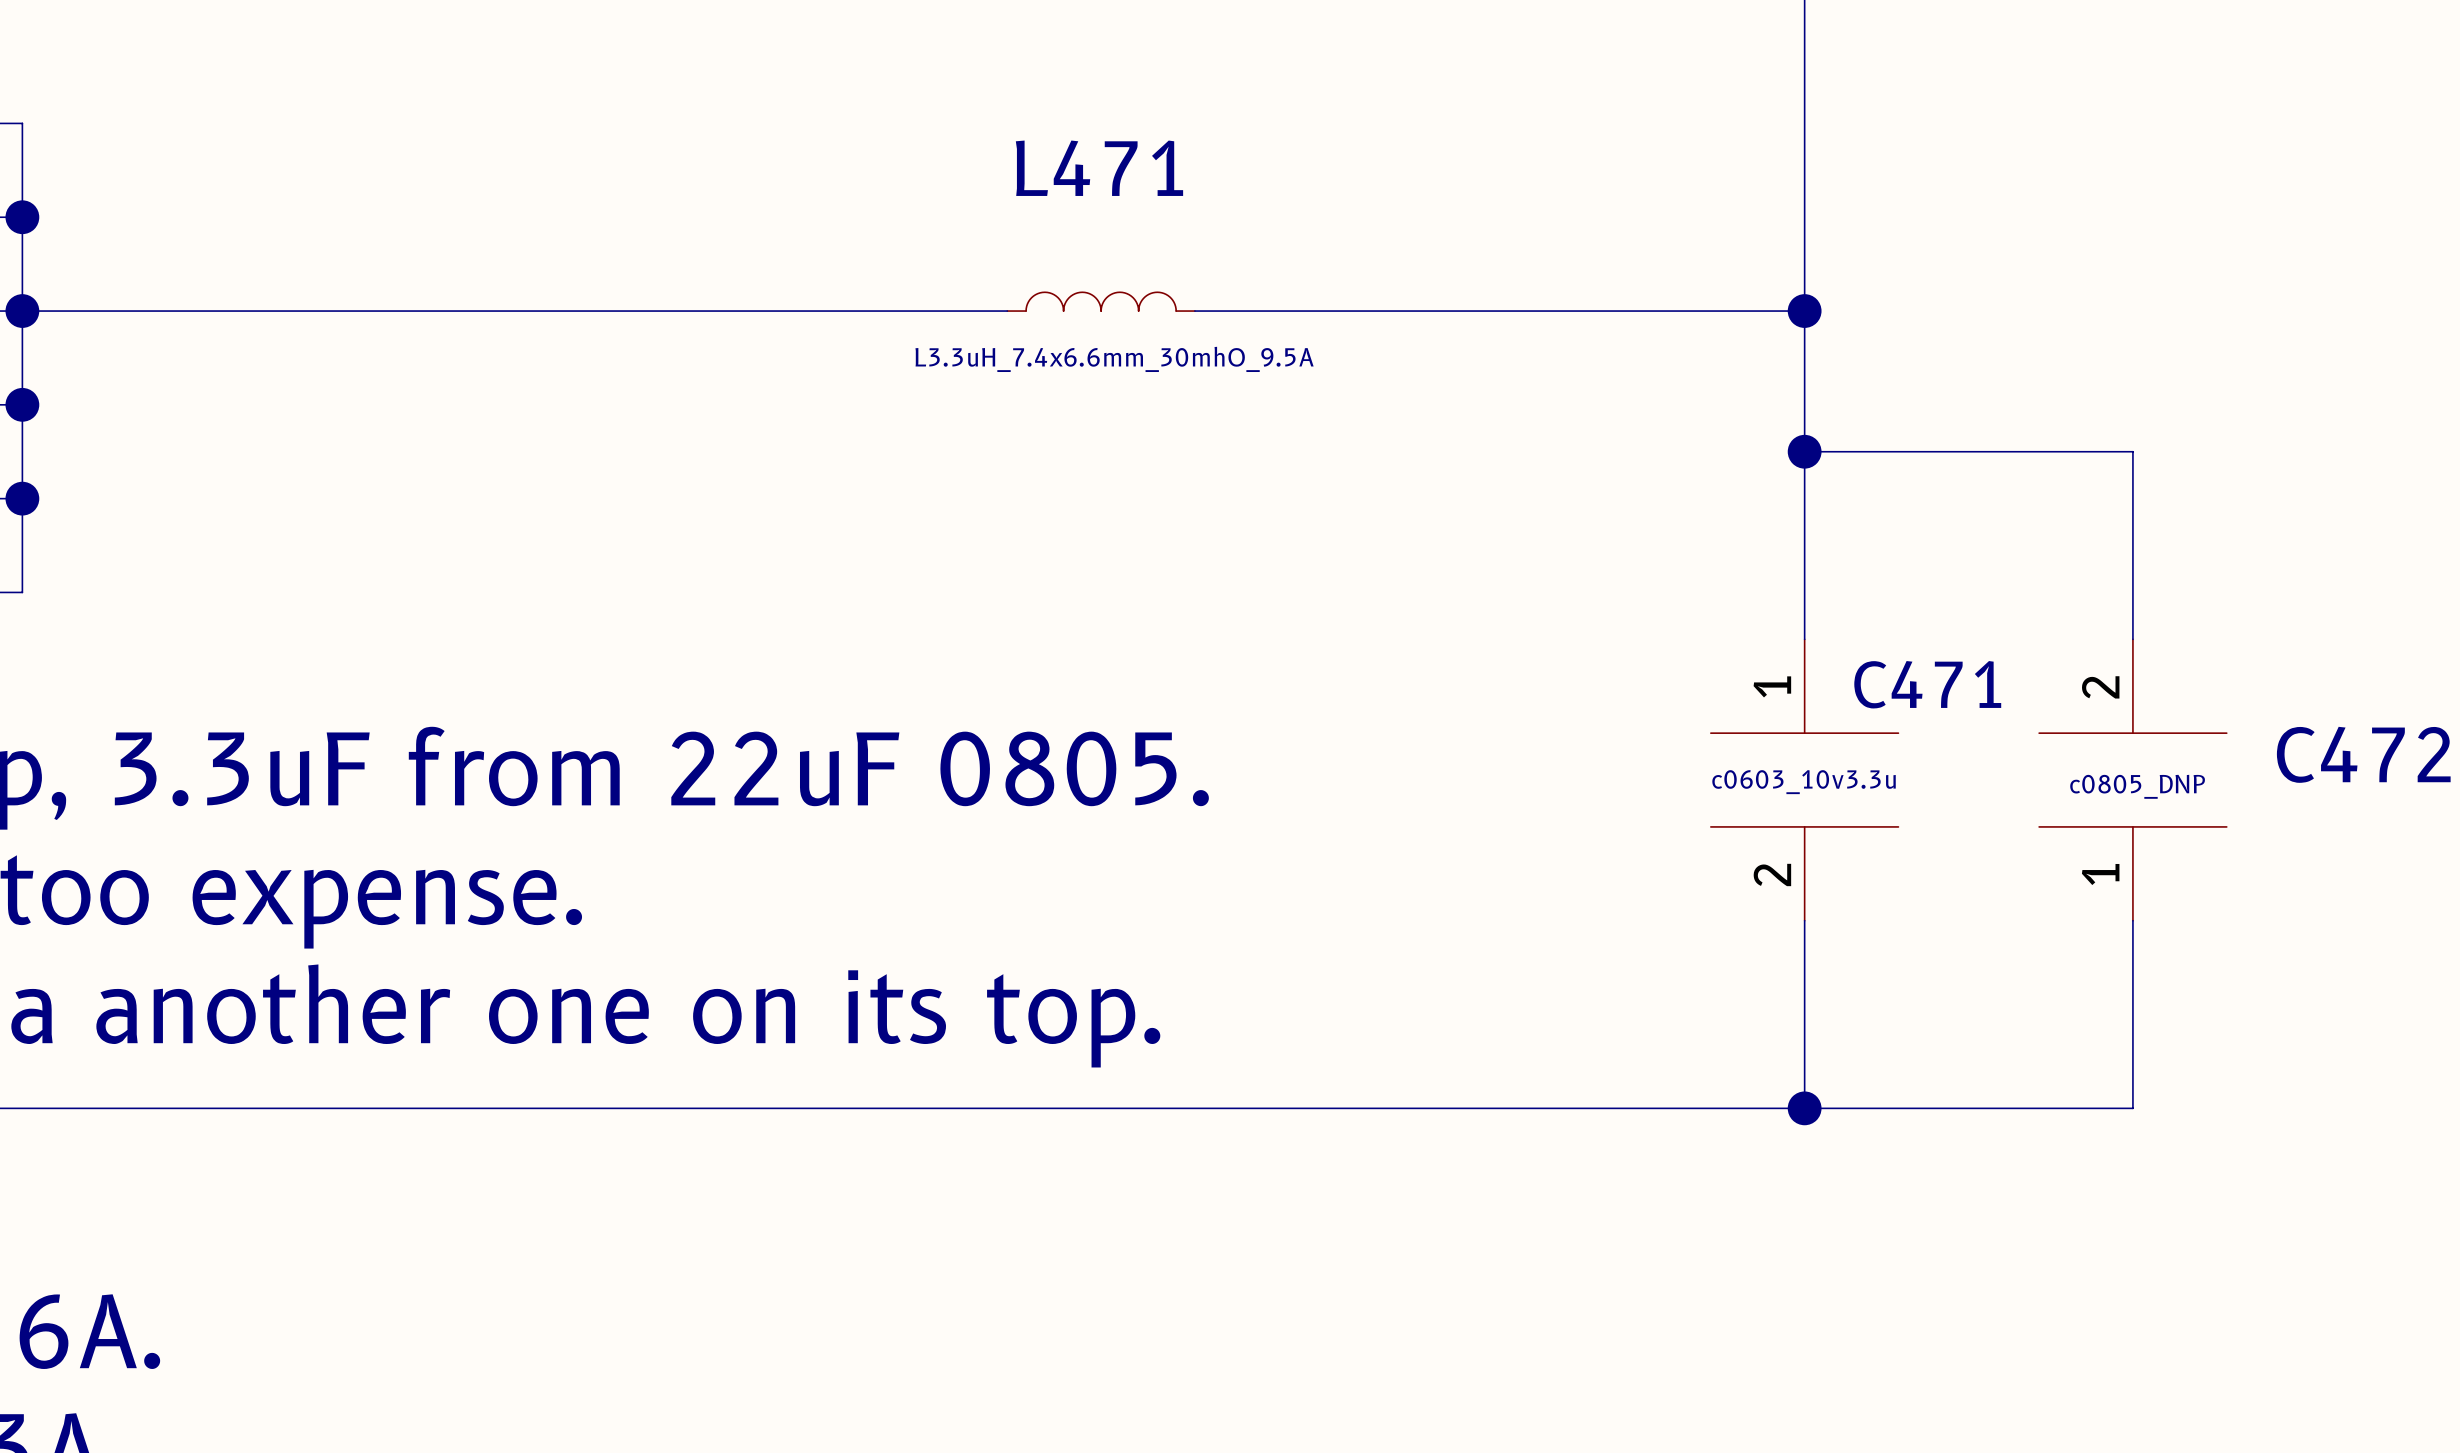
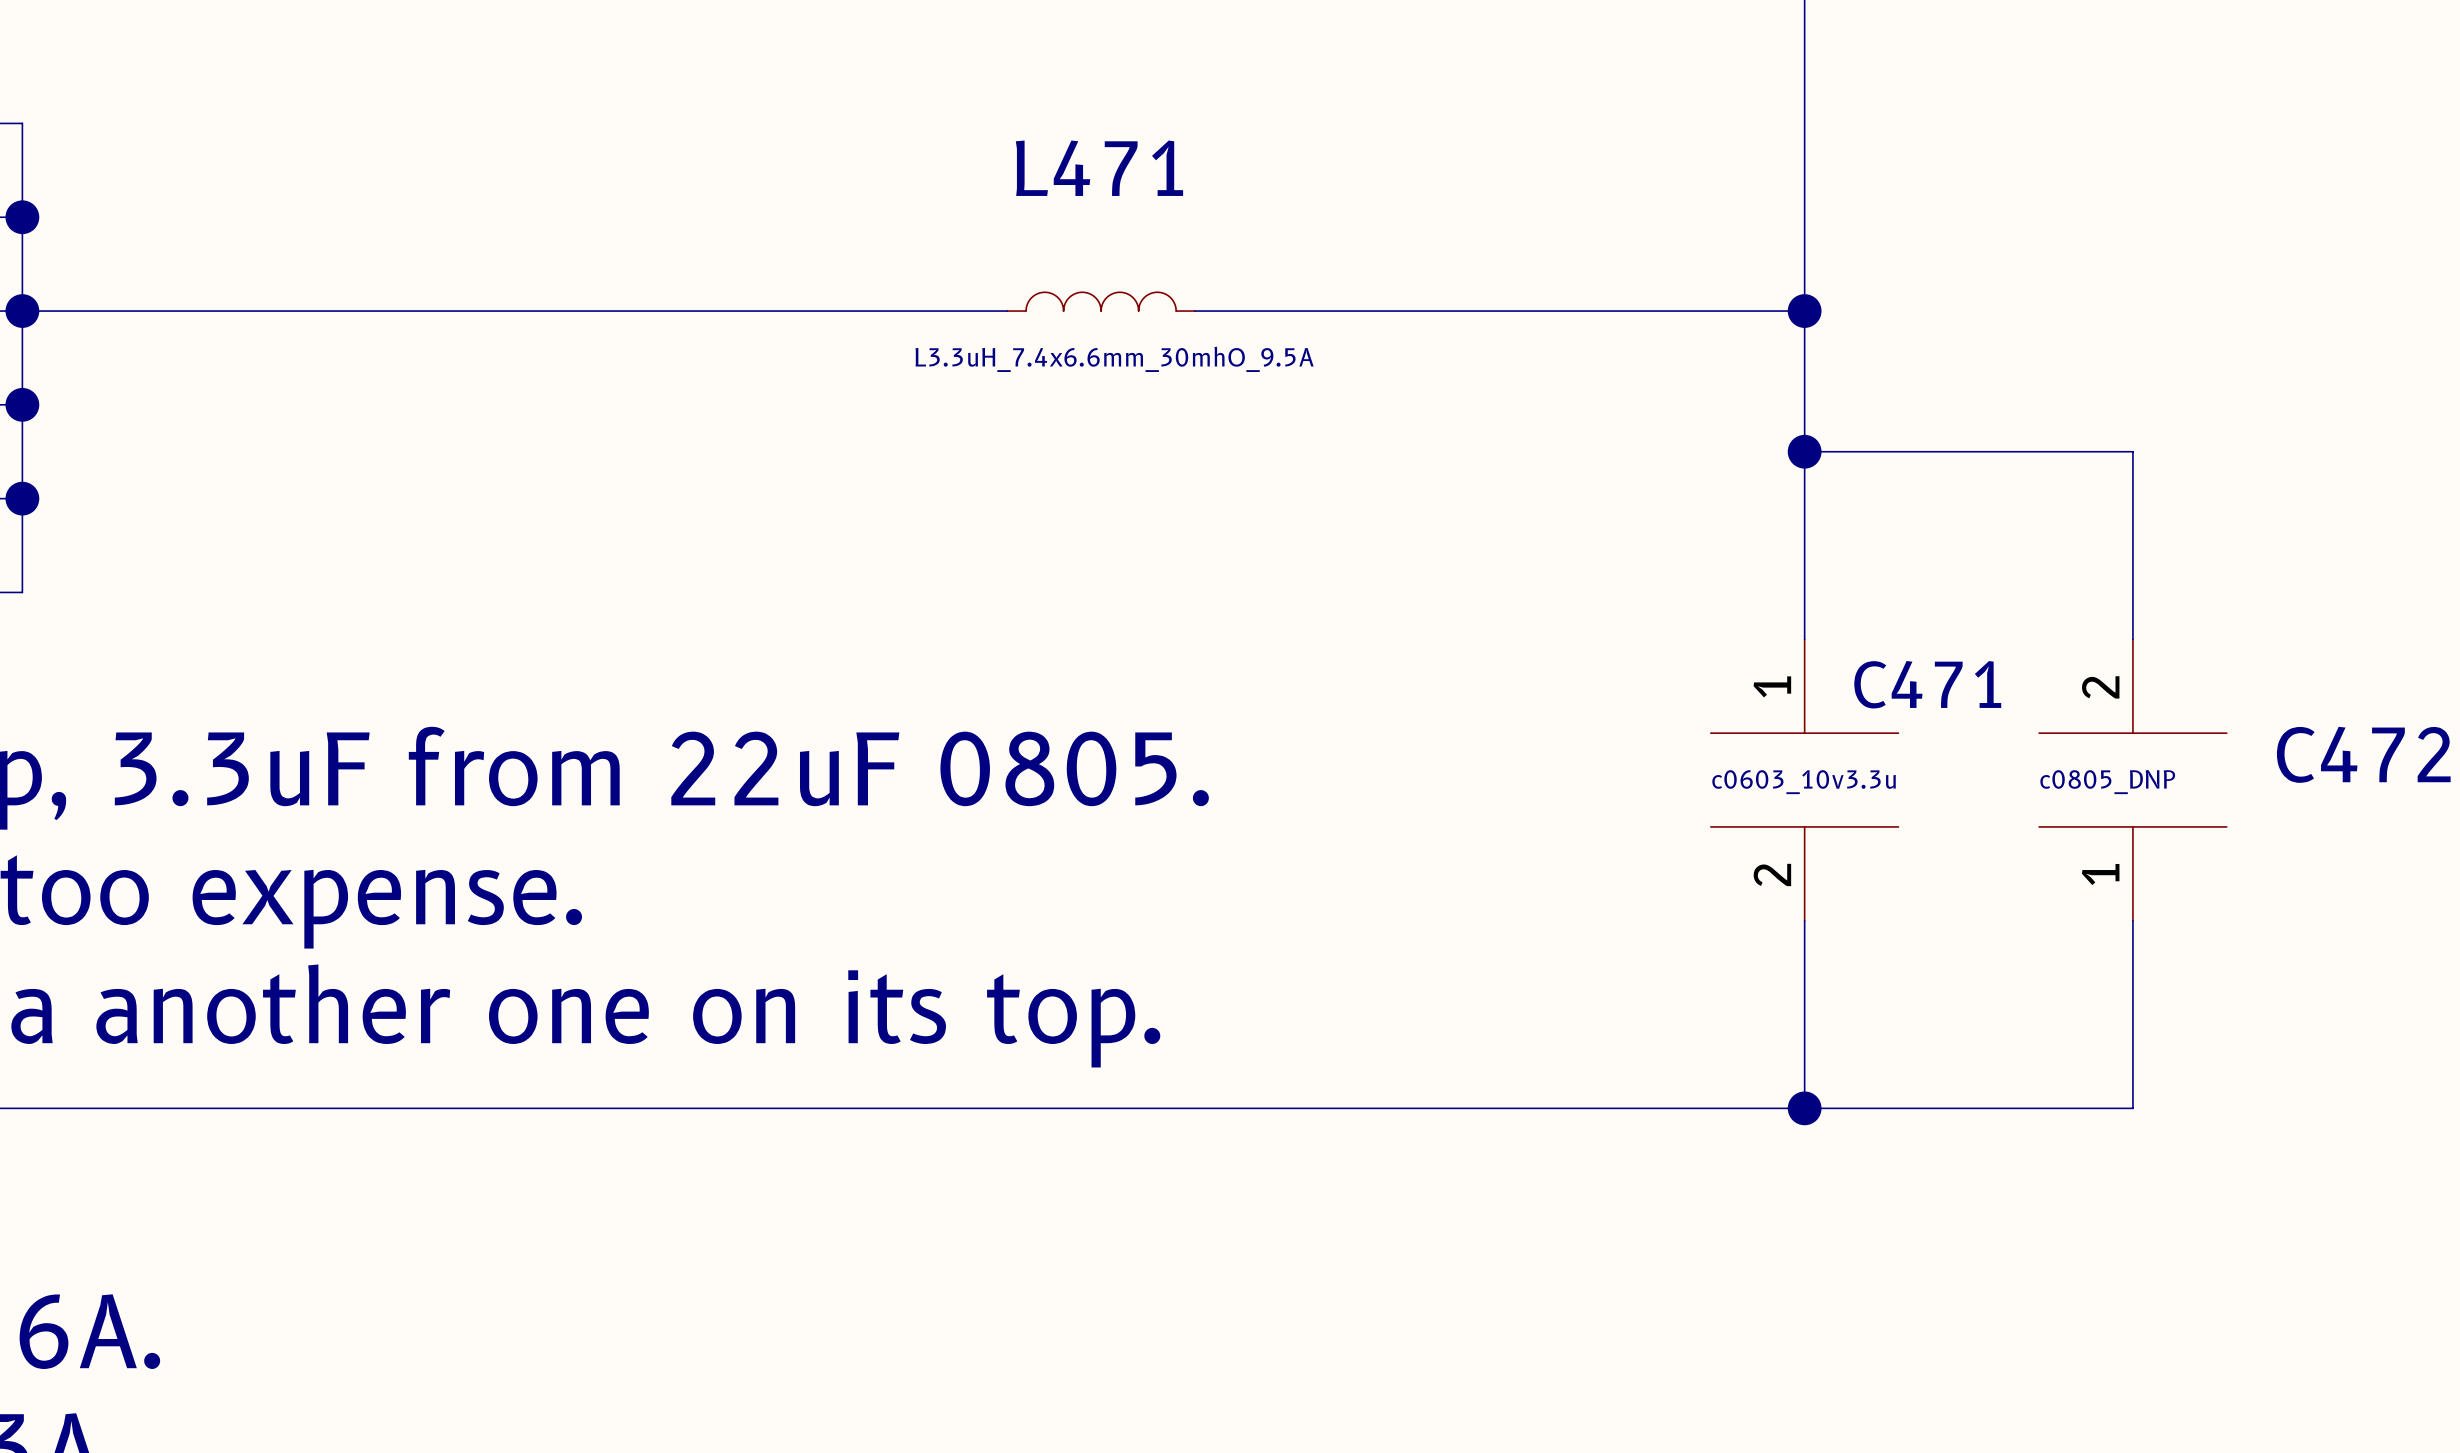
C472 value position: c0805_DNP (2137, 786) -> c0805_DNP (2107, 782)

